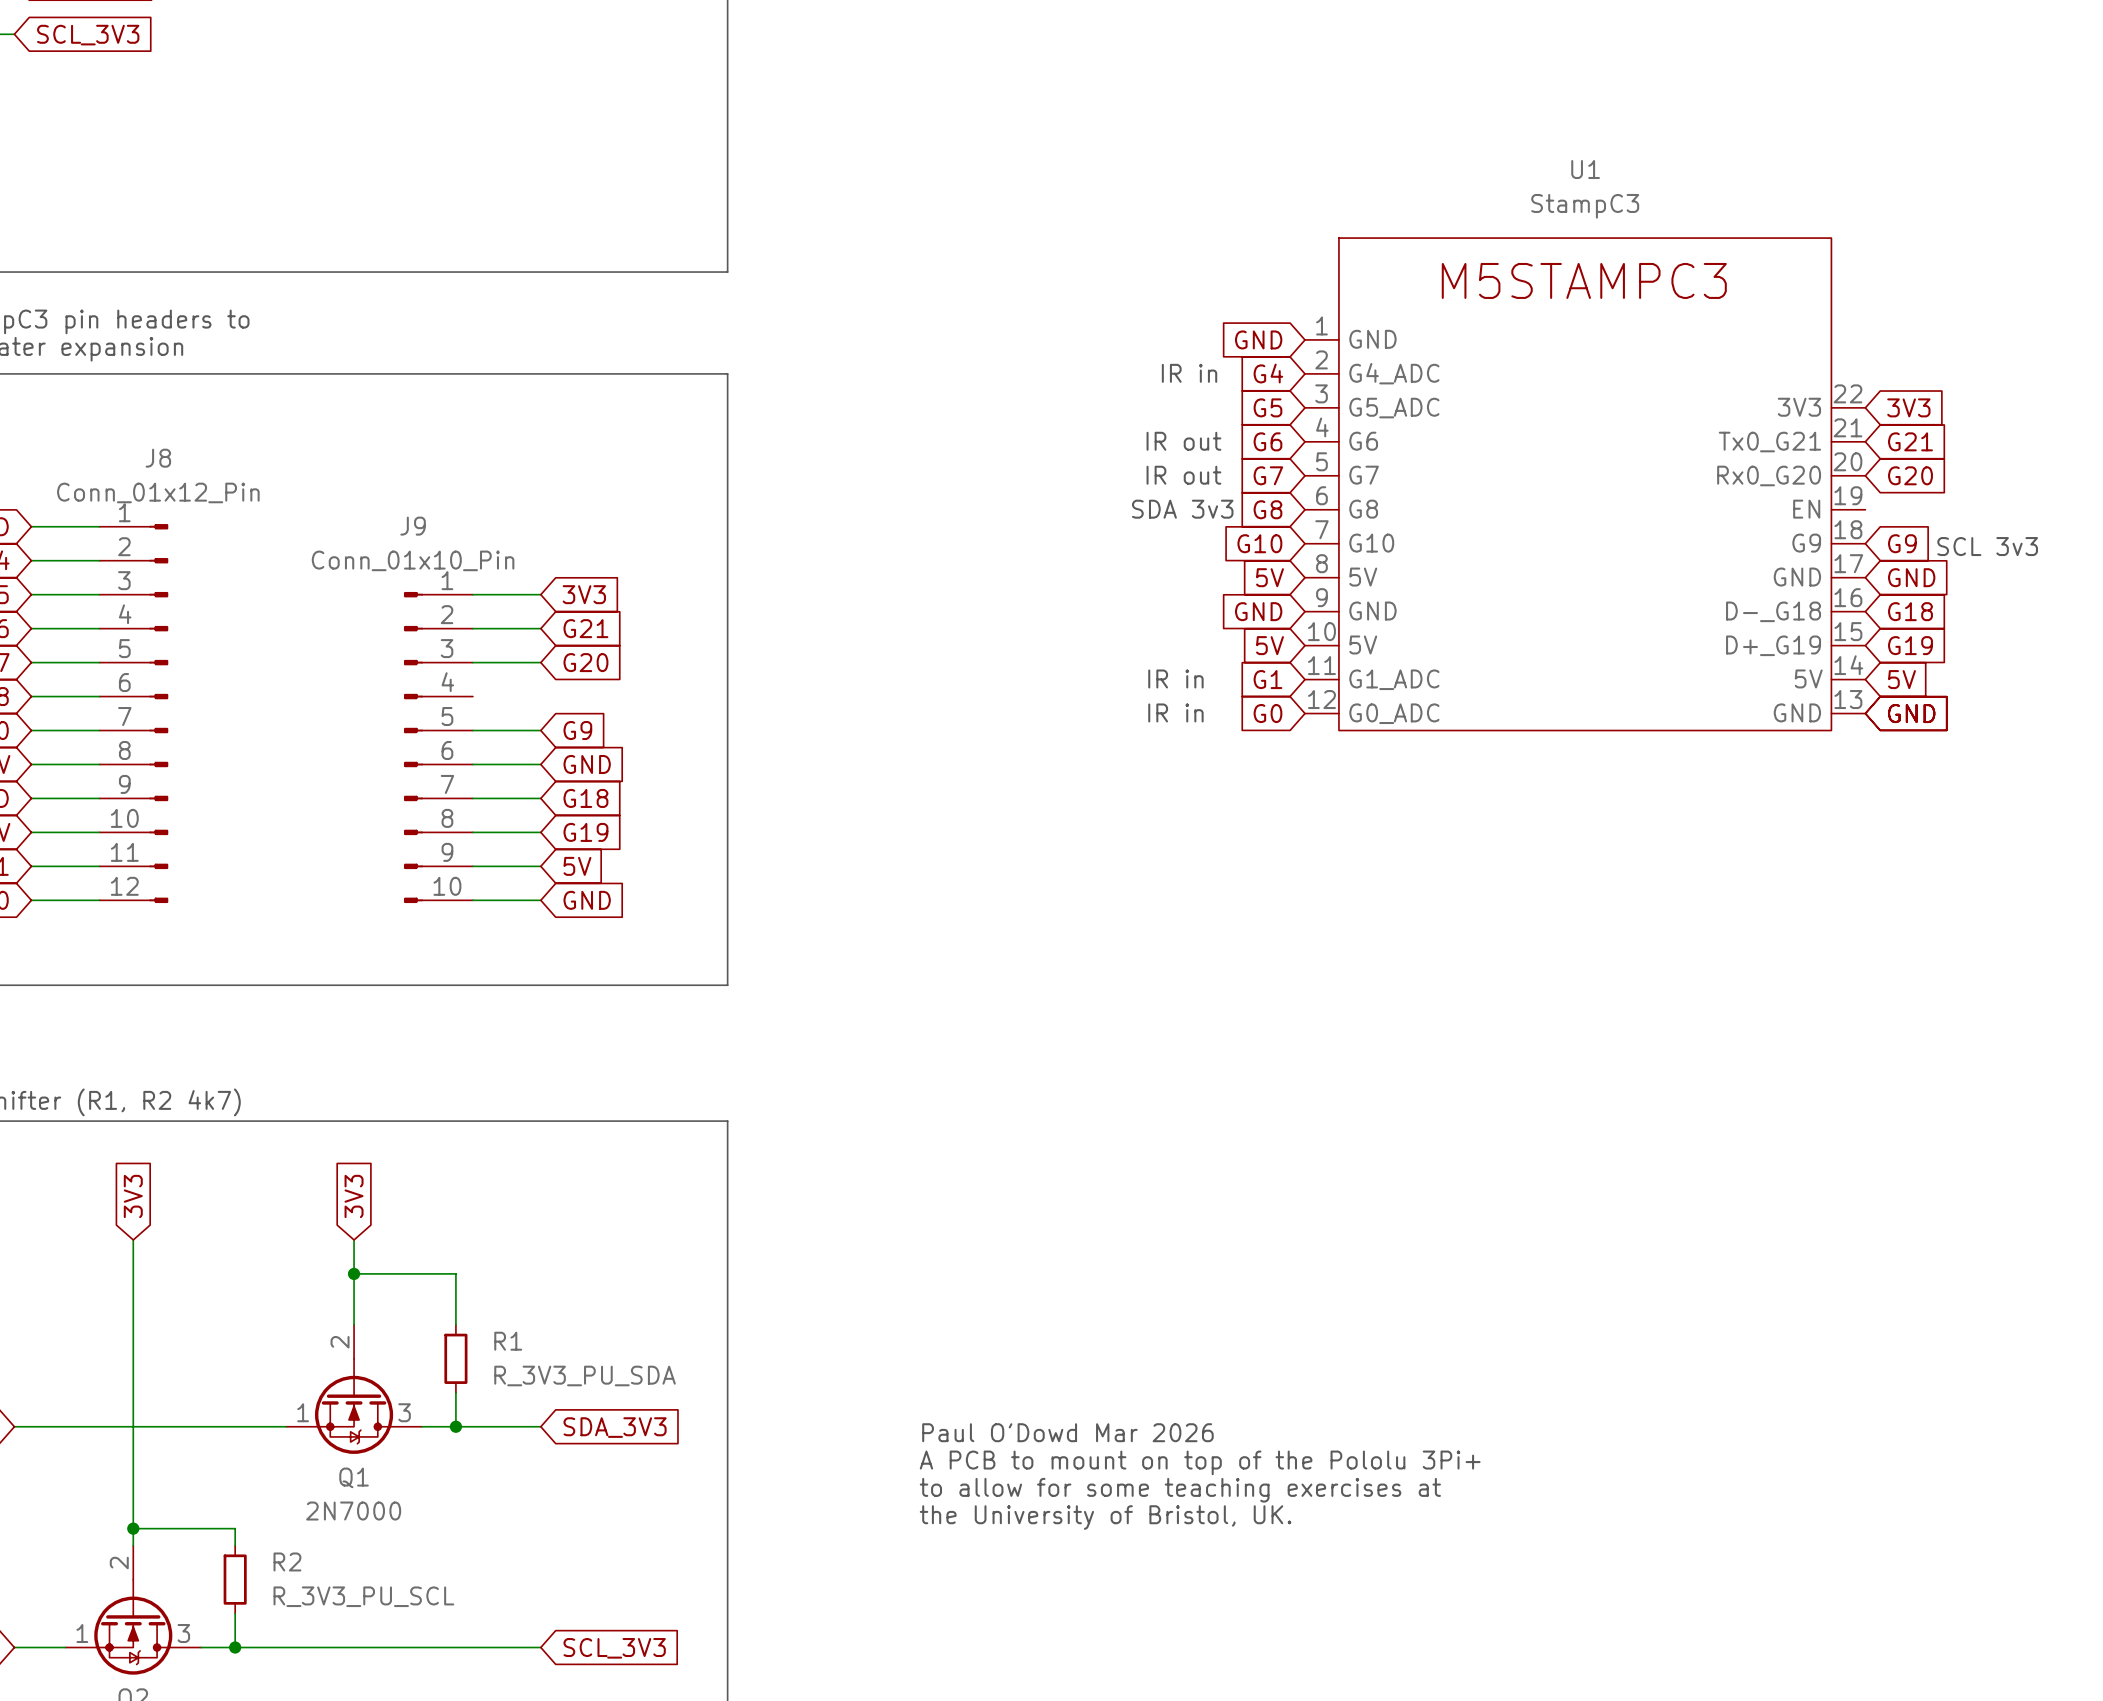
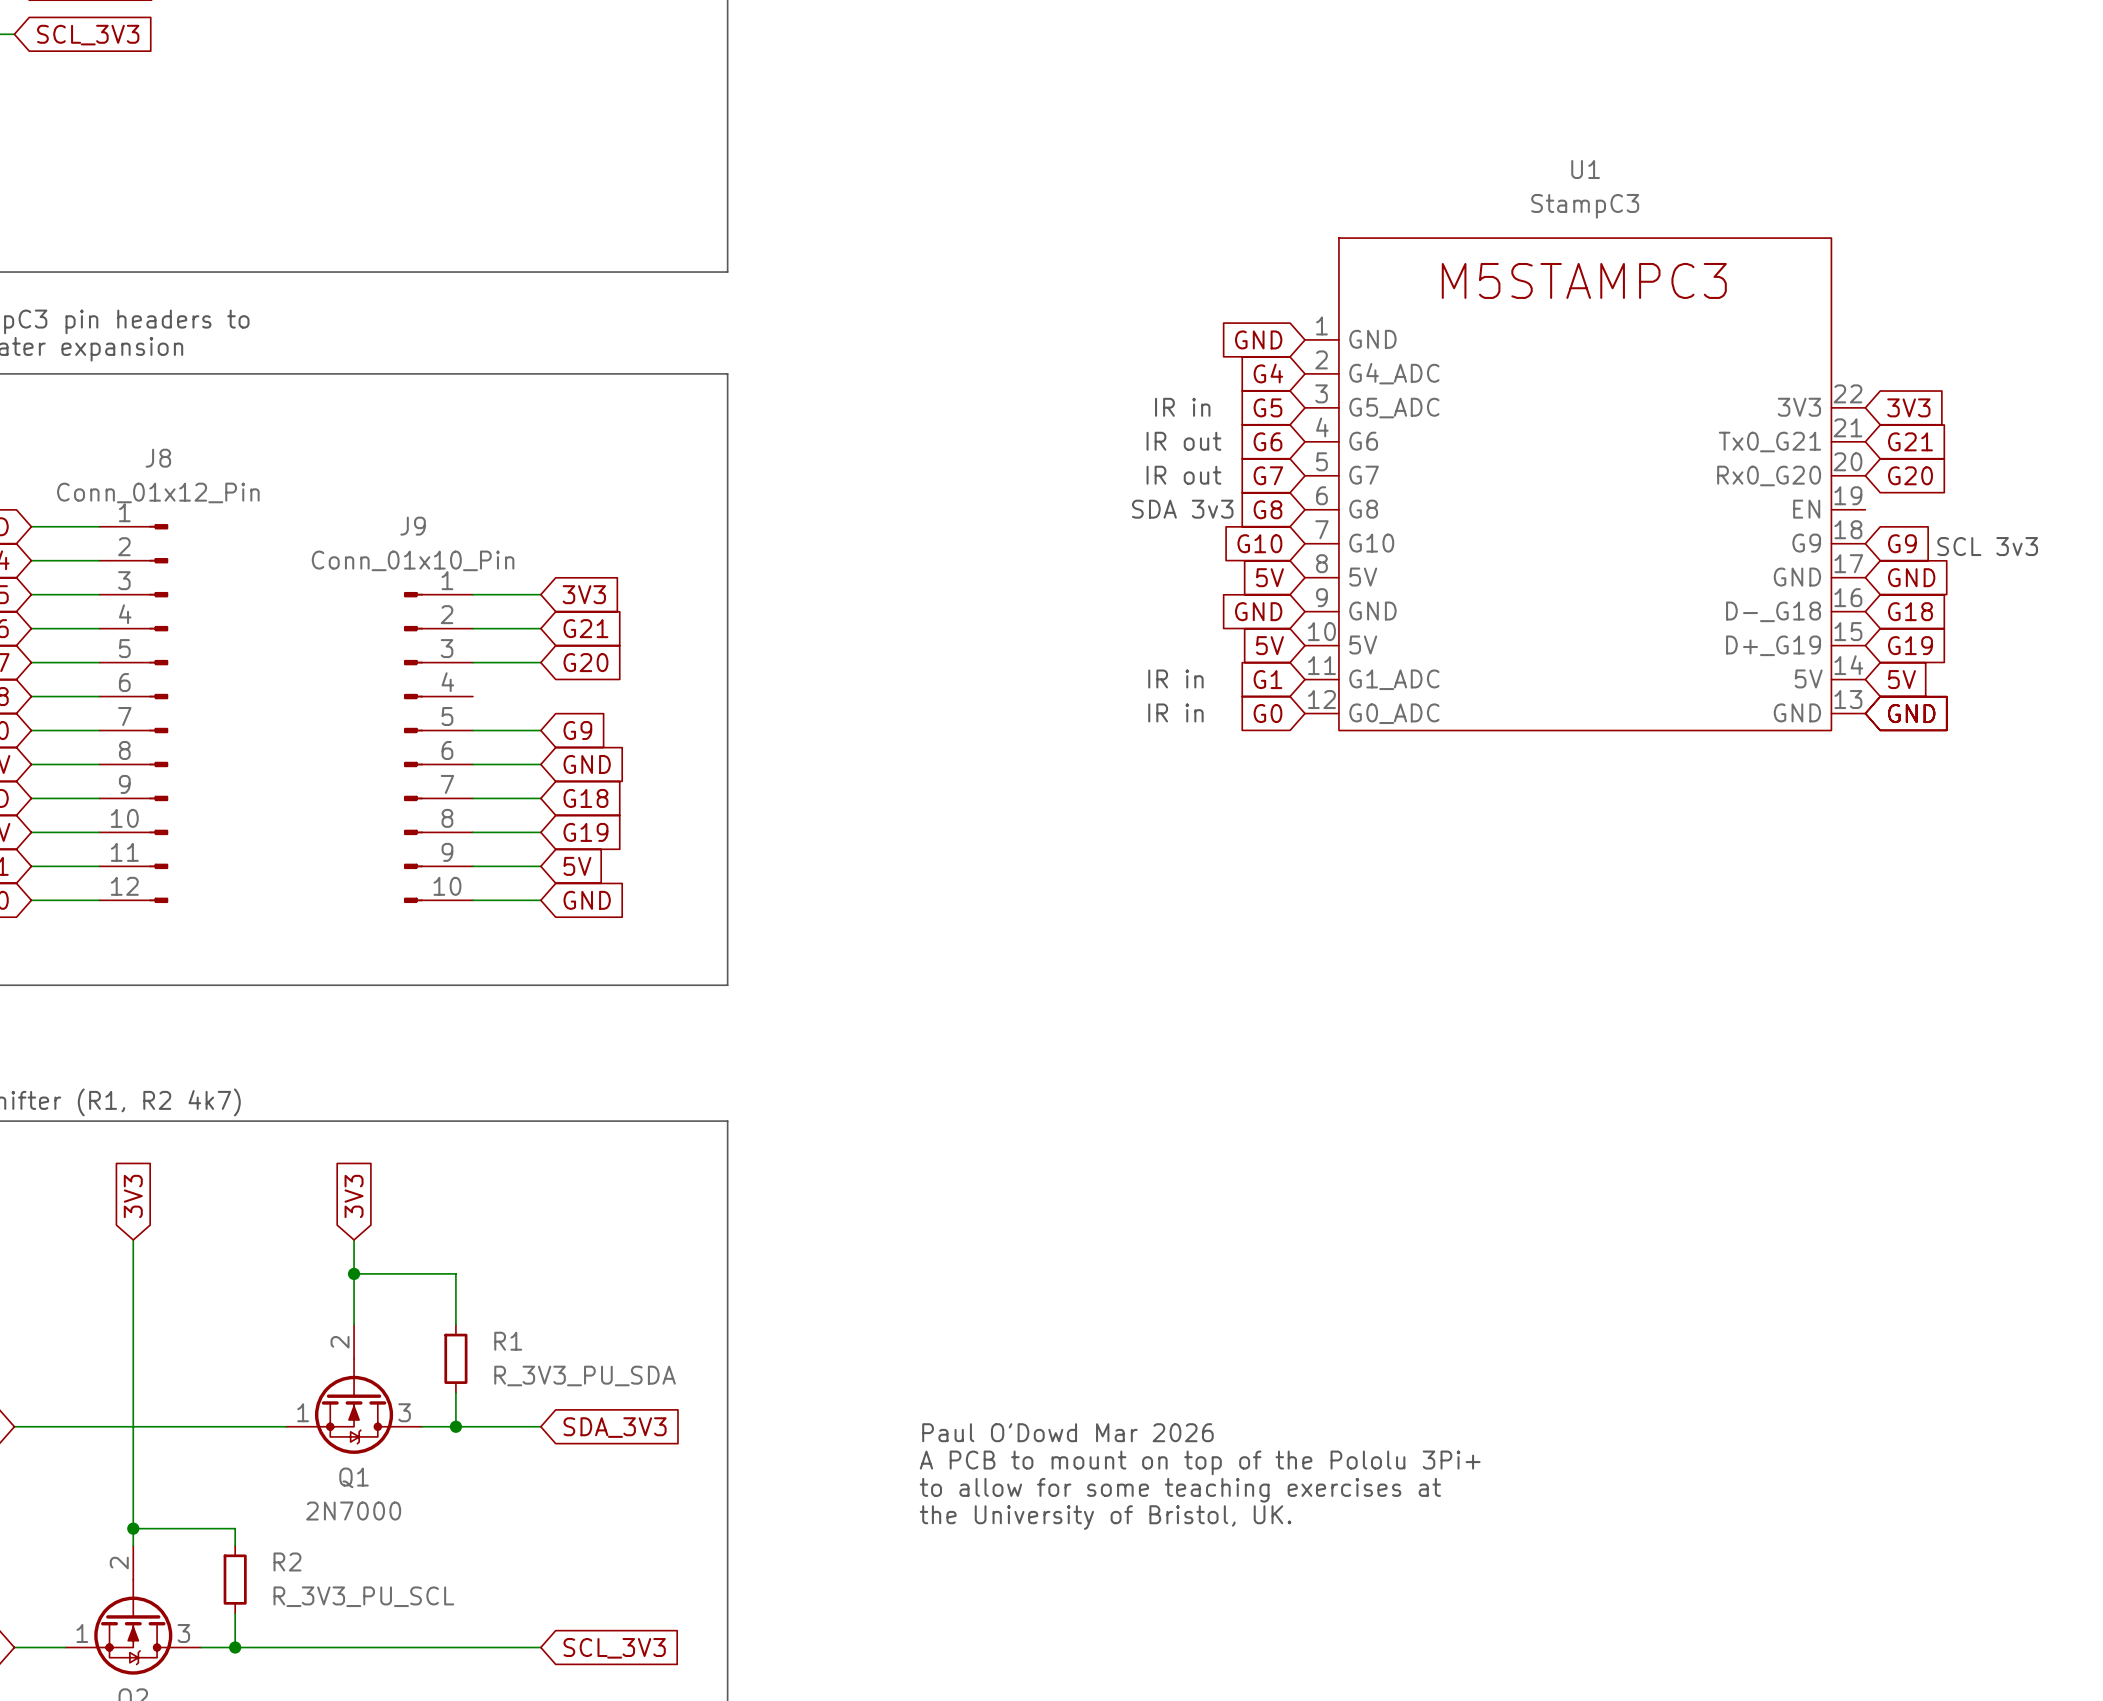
text position: IR in (1189, 373) -> IR in (1182, 407)

